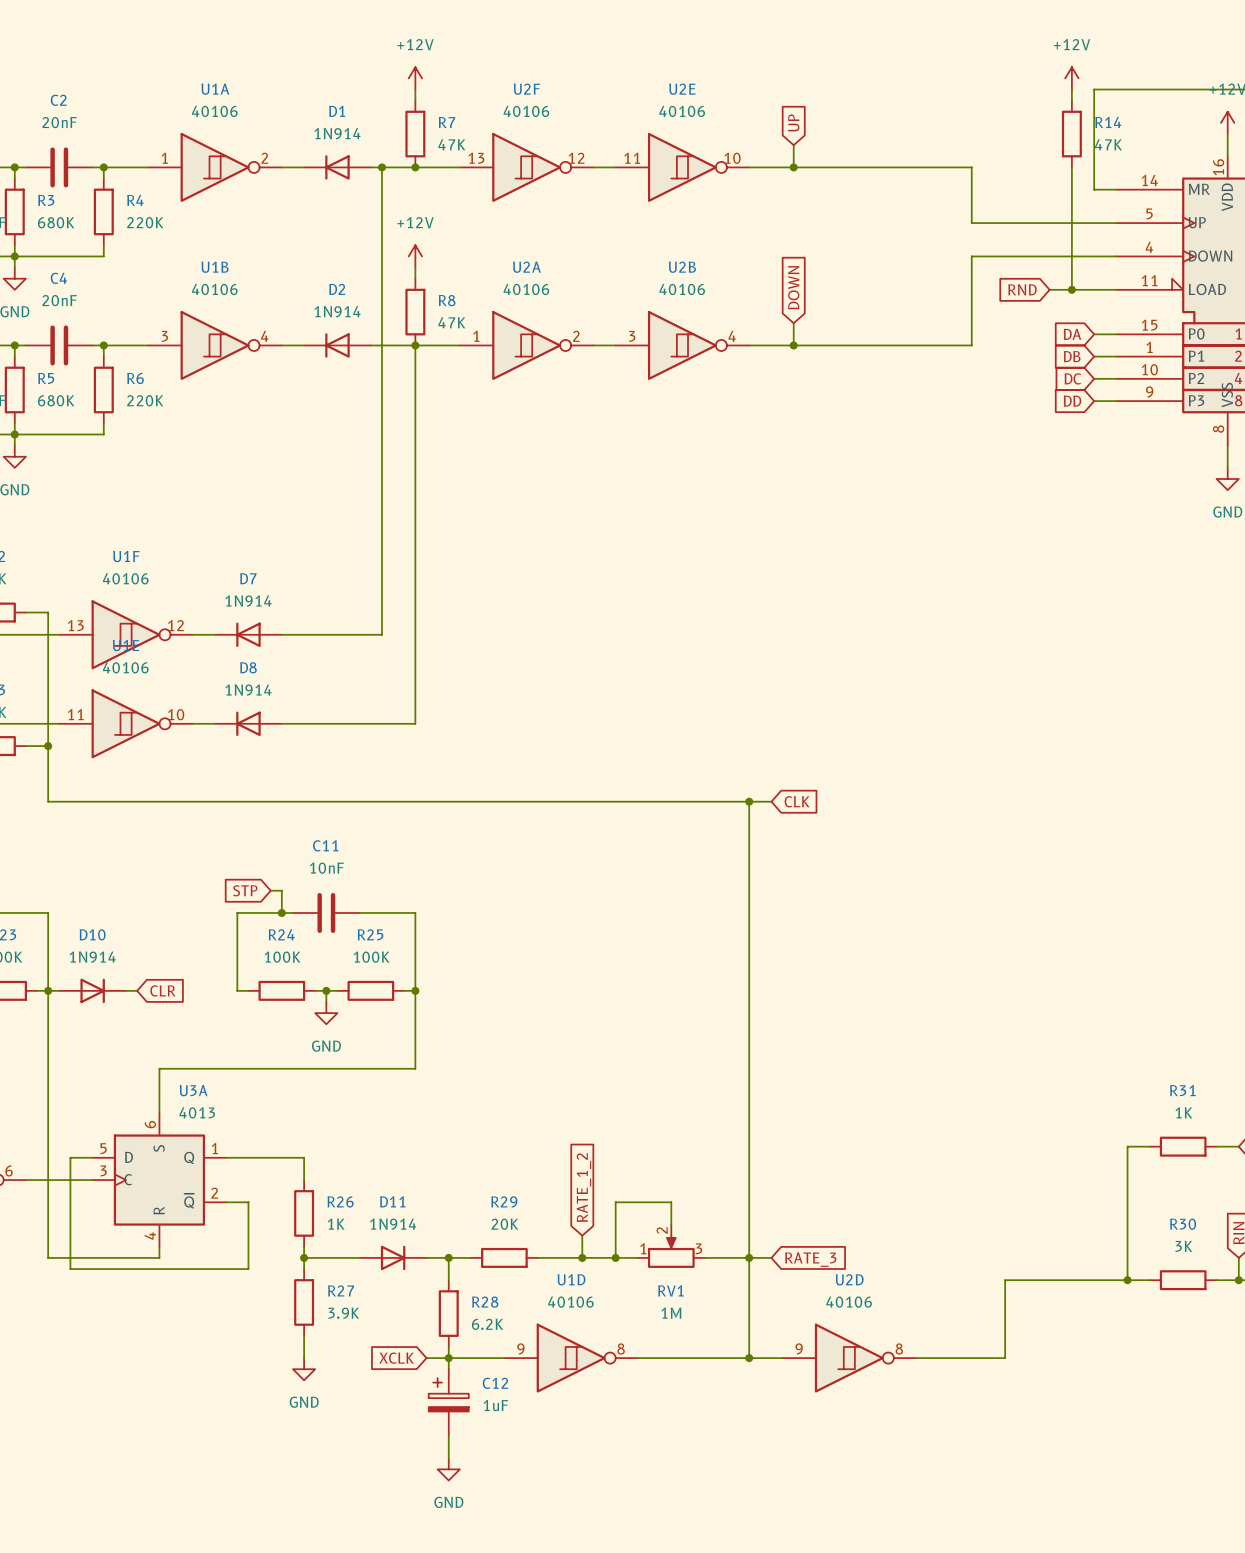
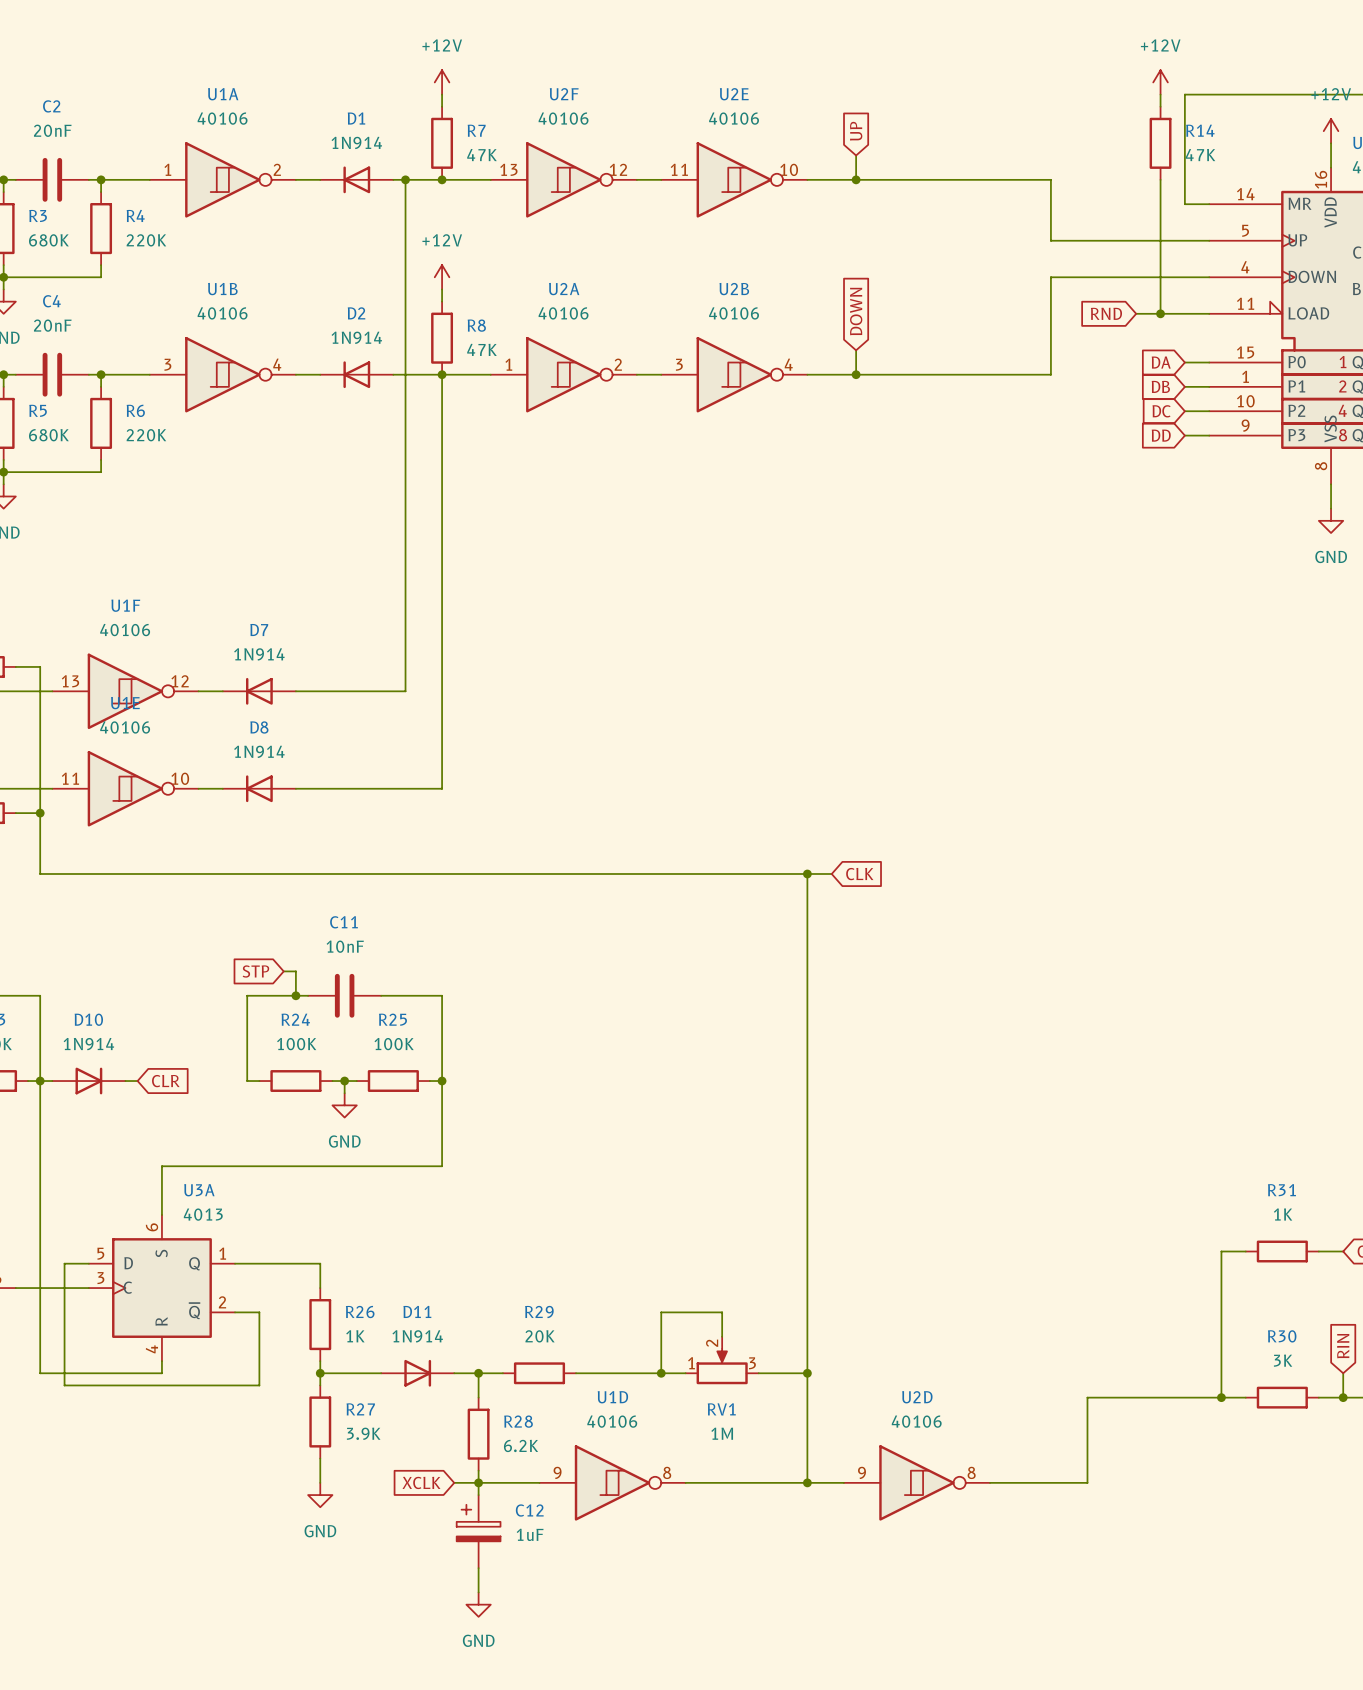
global label: RATE_1_2 (583, 1187) -> none
wire: (582, 1235) (582, 1257) -> none
junction: (582, 1257) -> none
wire: (749, 1257) (771, 1257) -> none
global label: RATE_3 (810, 1259) -> none

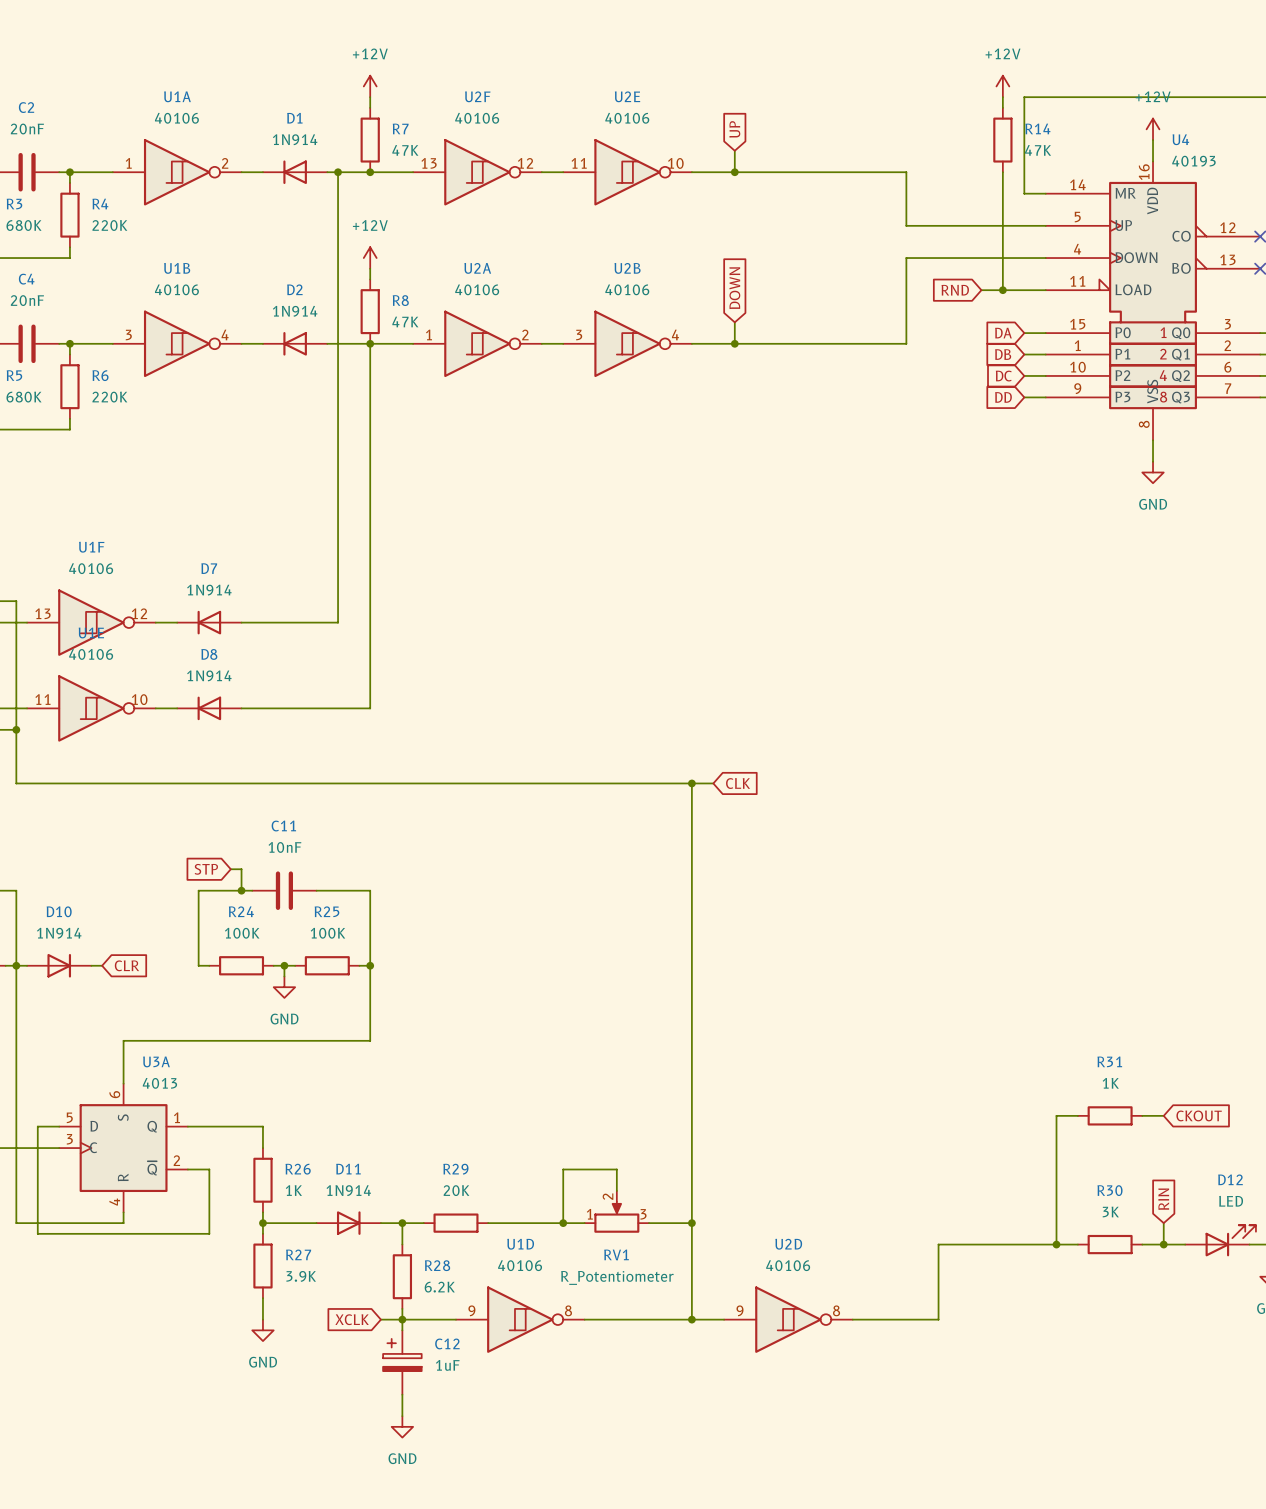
RV1 value: 1M (722, 1433) -> R_Potentiometer (617, 1277)

